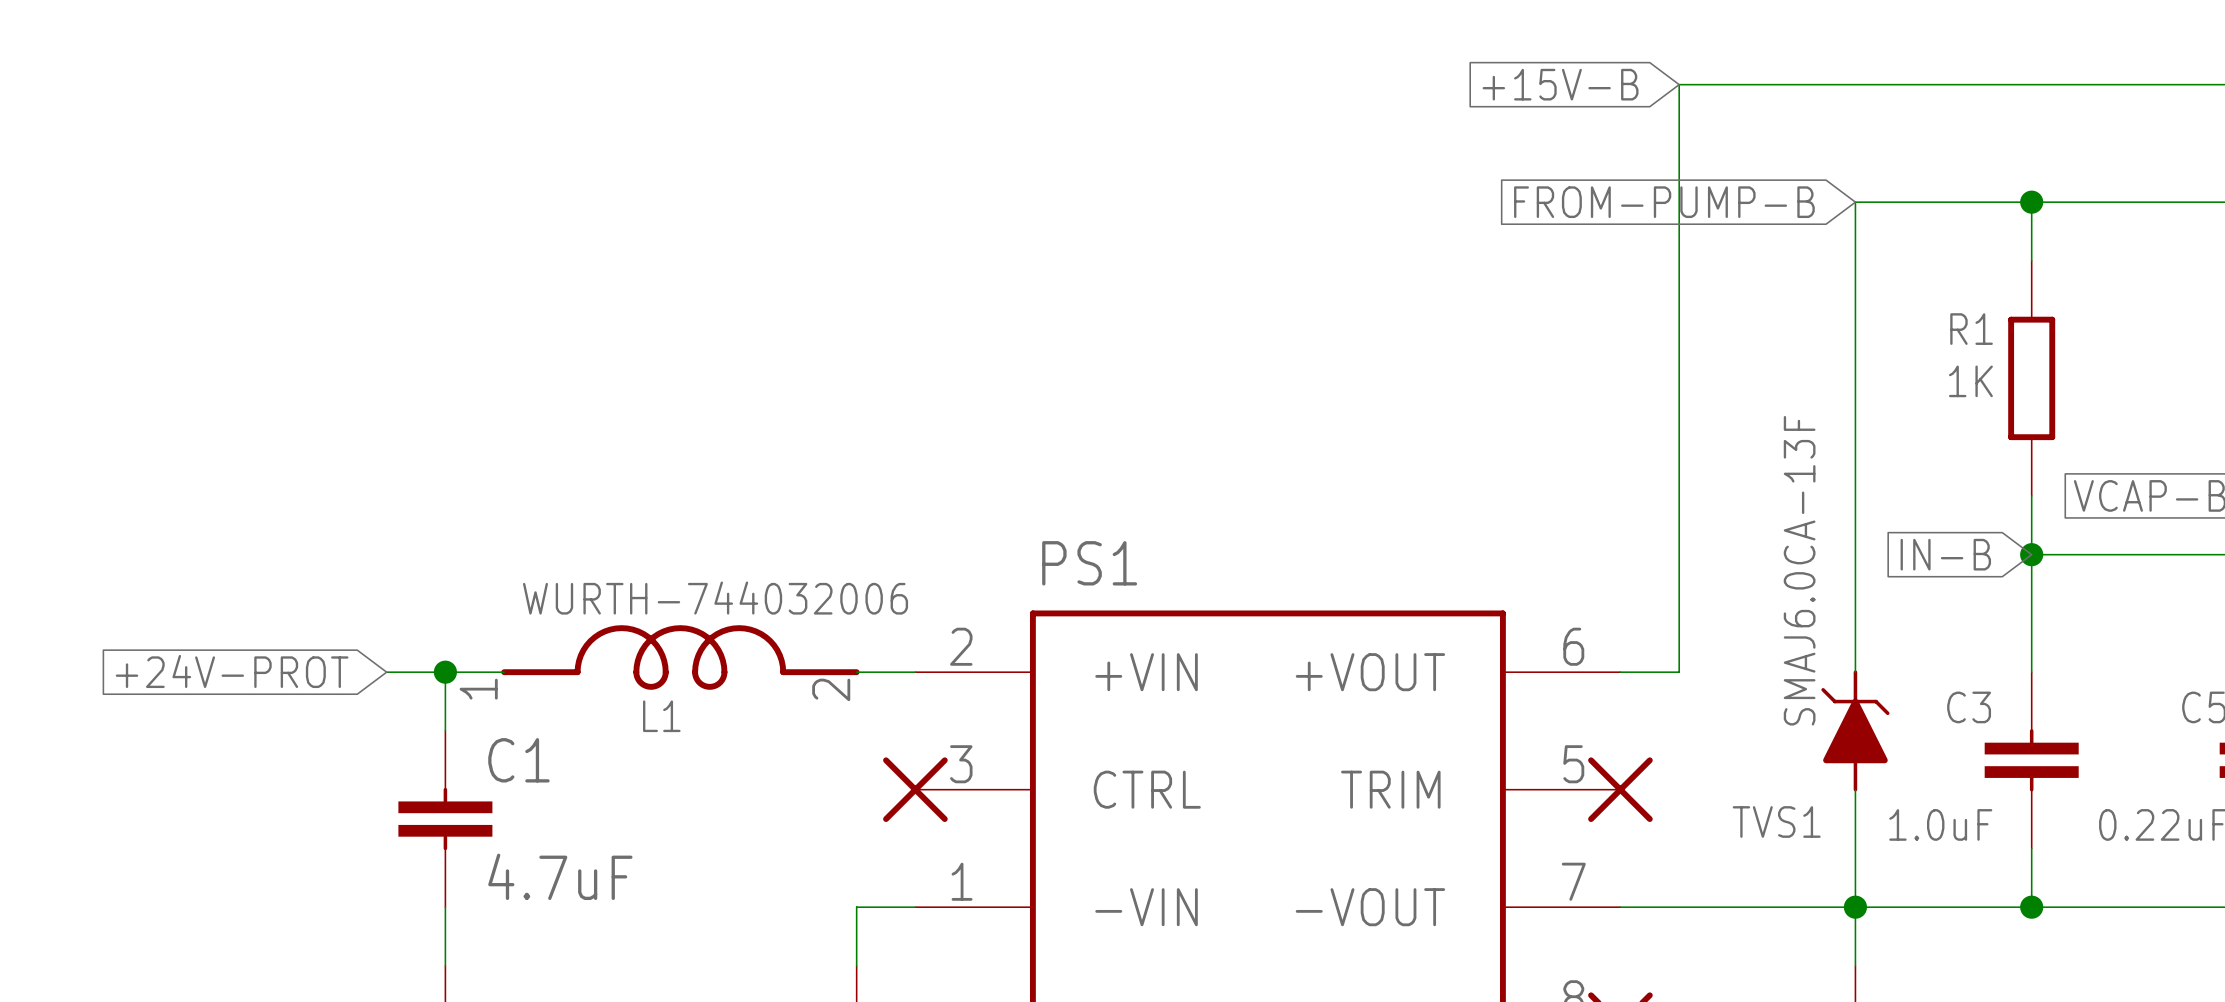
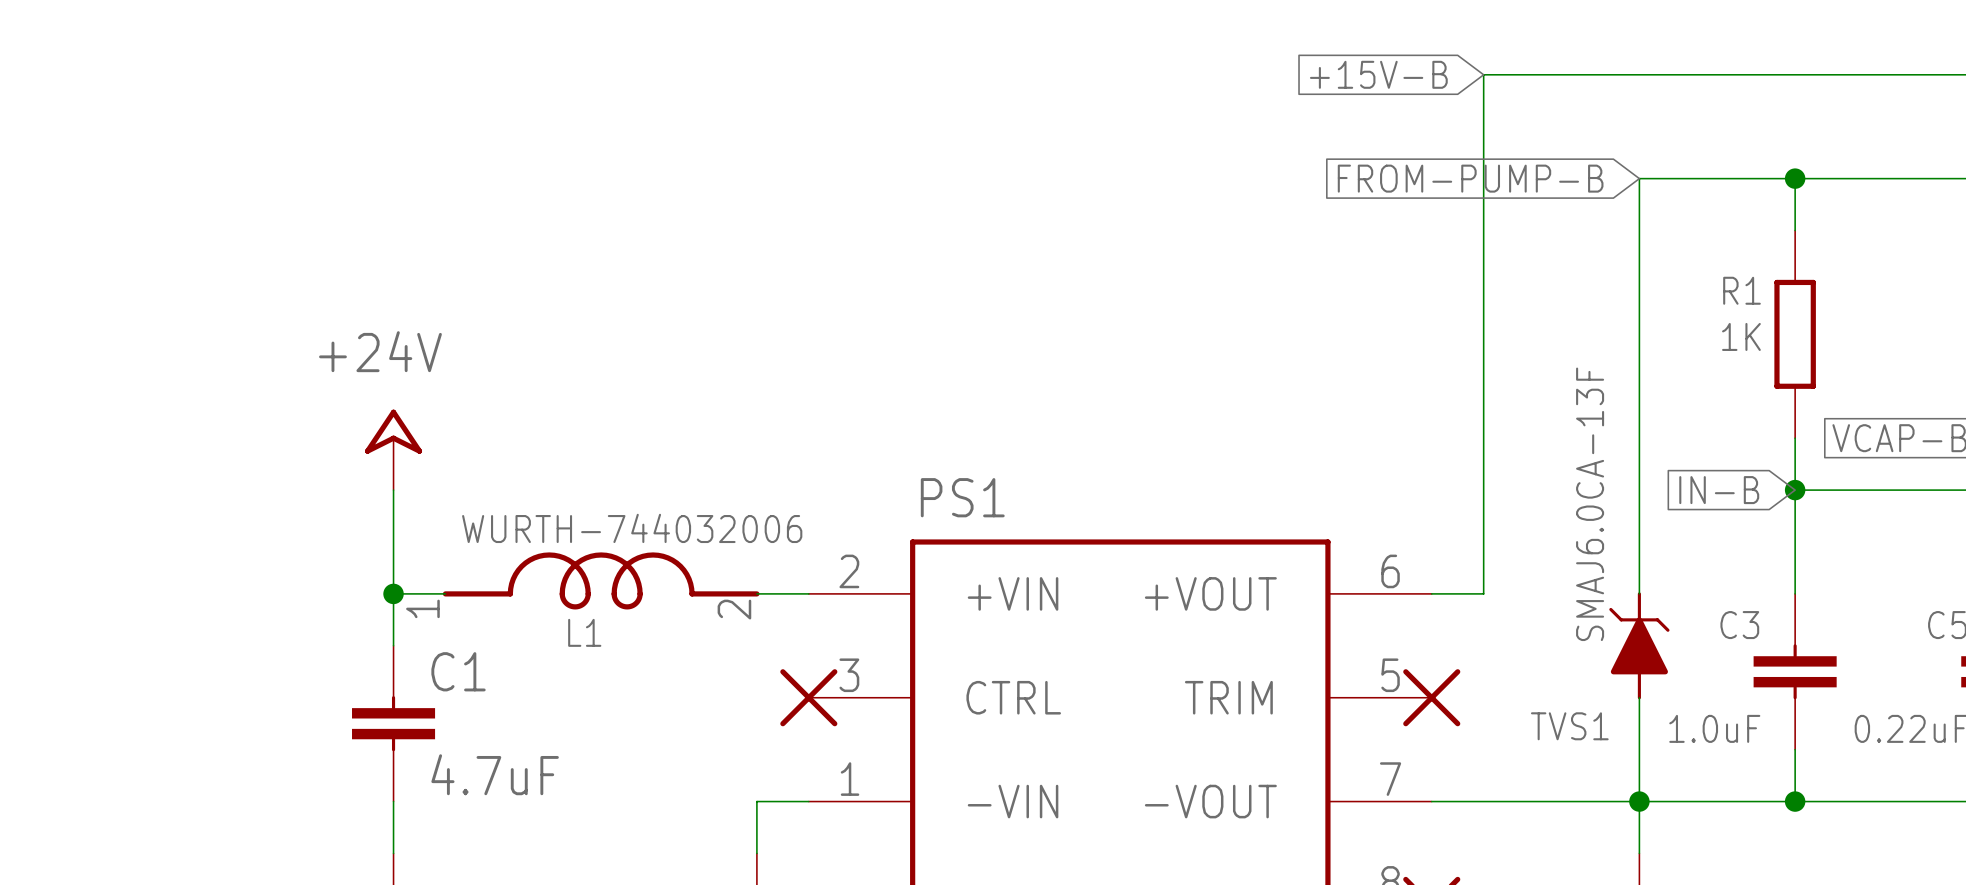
power symbol: none -> +24V (393, 449)
global label: +24V-PROT (232, 671) -> none
wire: (386, 672) (445, 672) -> (393, 490) (393, 593)

